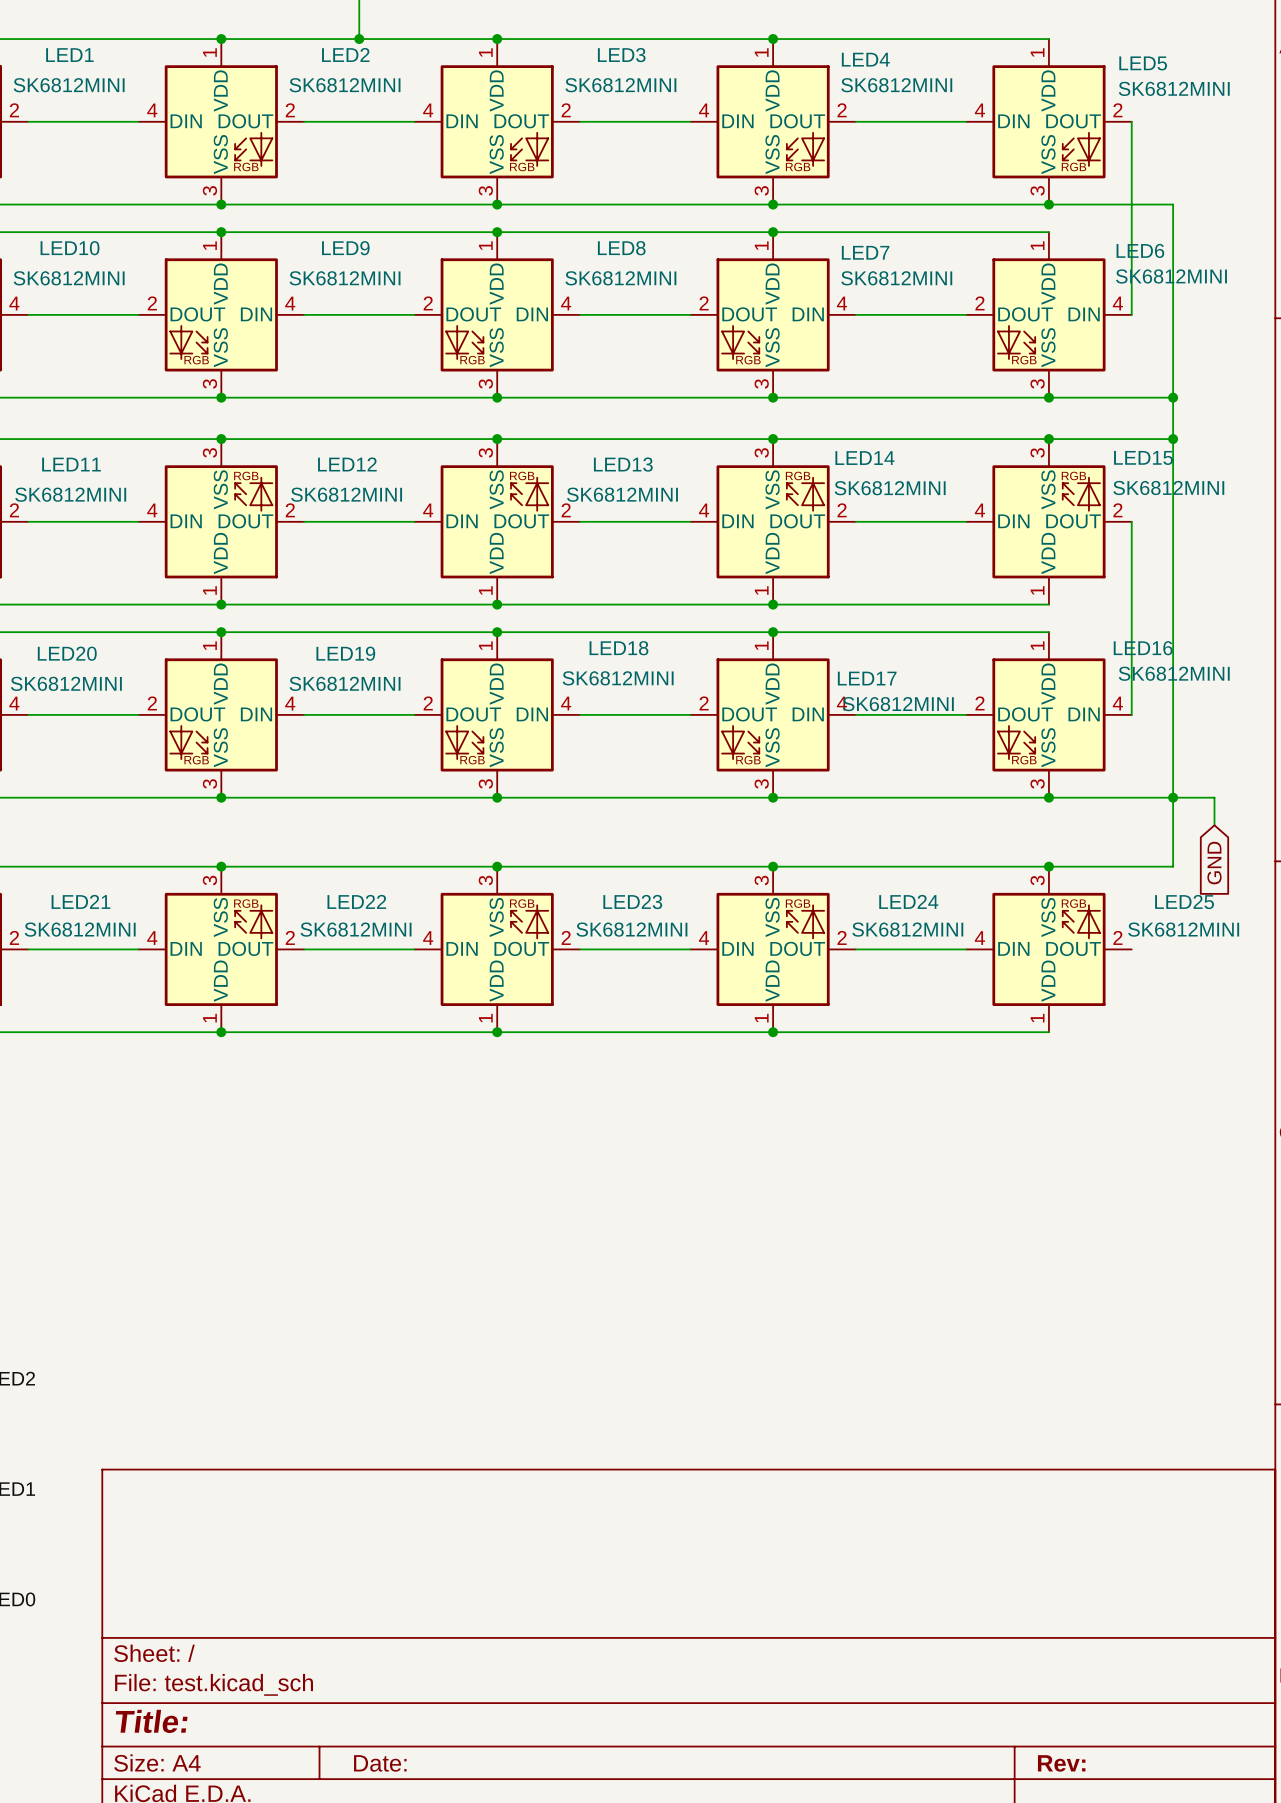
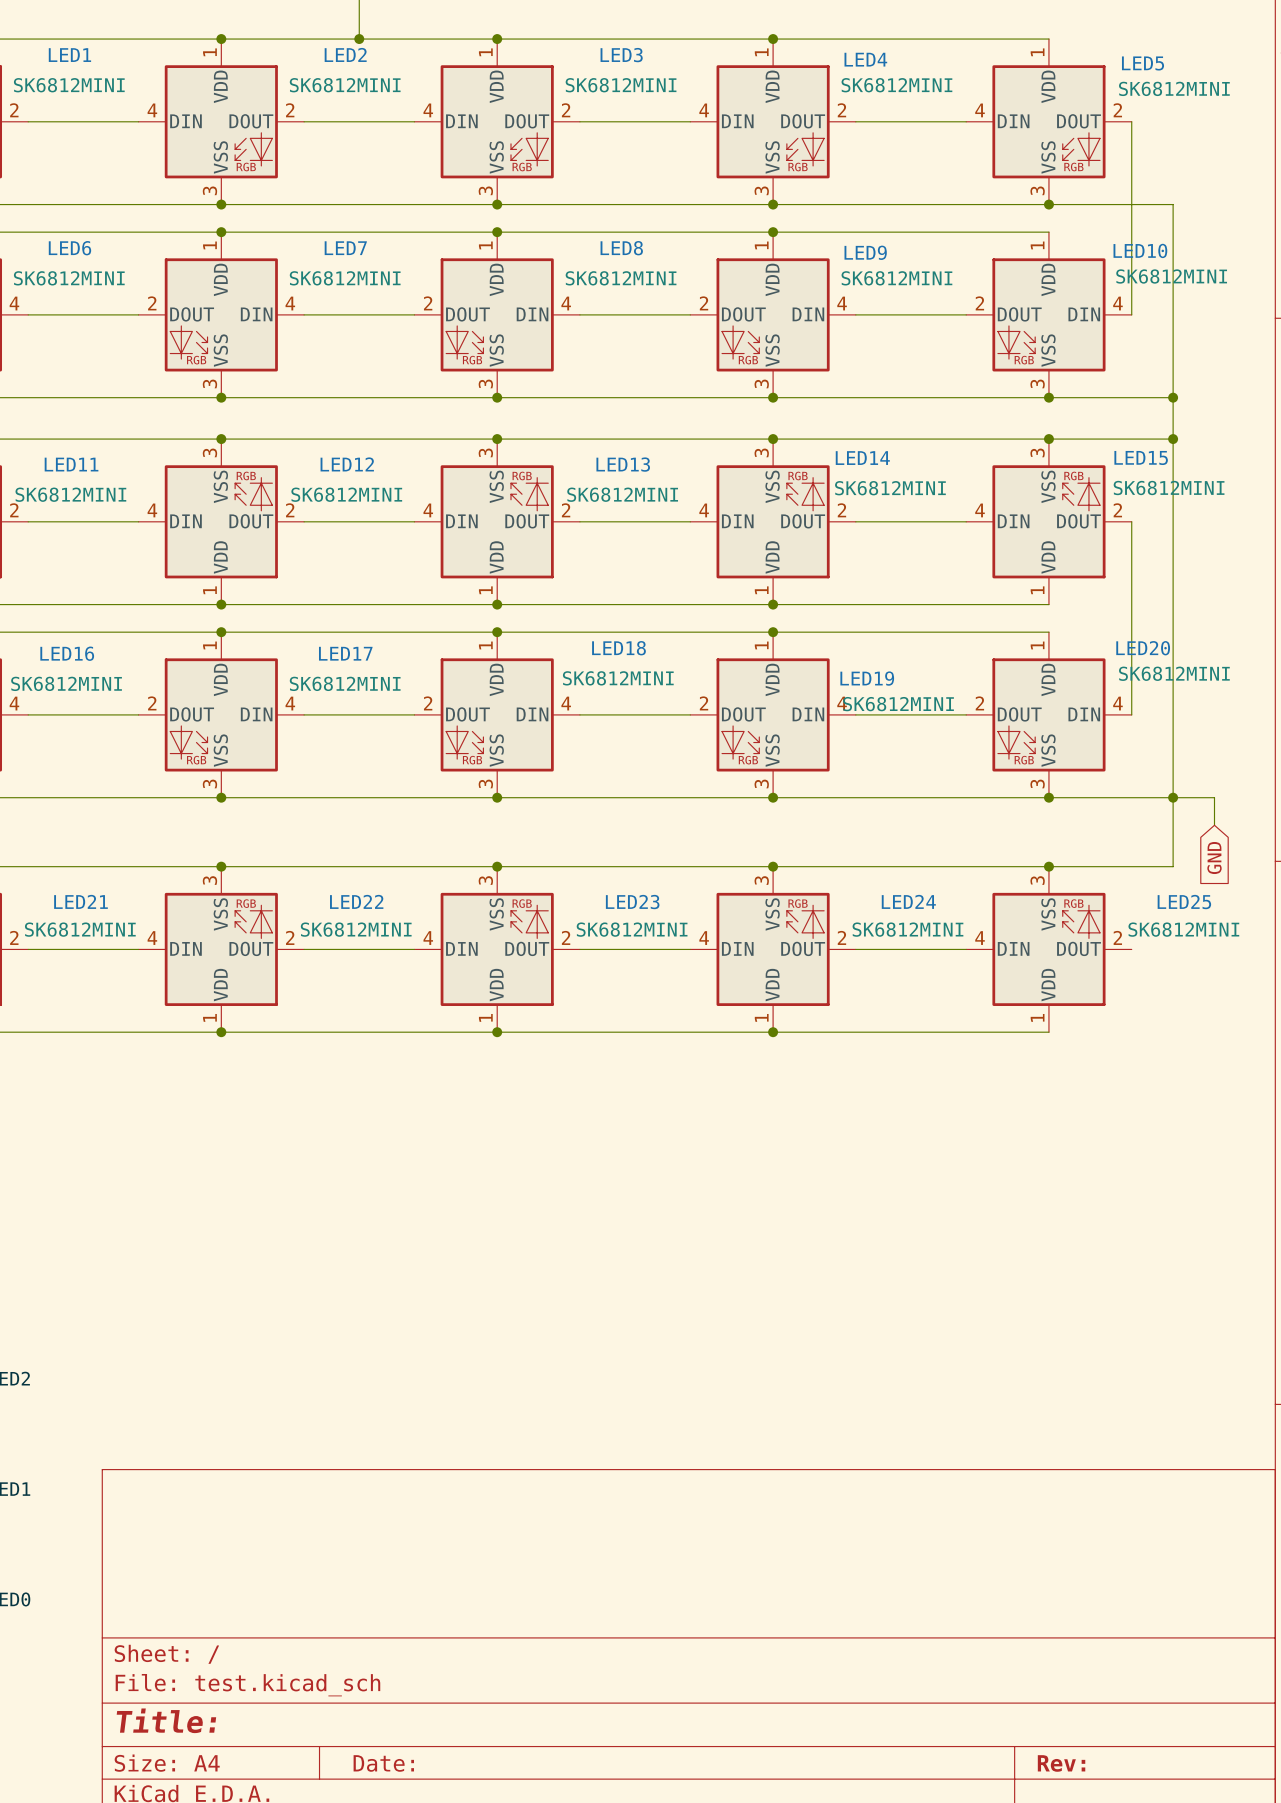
LED10 name: LED10 (70, 248) -> LED6 (69, 248)
LED9 name: LED9 (345, 248) -> LED7 (345, 248)
LED6 name: LED6 (1140, 250) -> LED10 (1140, 250)
LED7 name: LED7 (865, 252) -> LED9 (865, 252)
LED16 name: LED16 (1143, 648) -> LED20 (1143, 648)
LED20 name: LED20 (67, 653) -> LED16 (67, 653)
LED19 name: LED19 (345, 653) -> LED17 (345, 653)
LED17 name: LED17 (867, 678) -> LED19 (867, 678)

